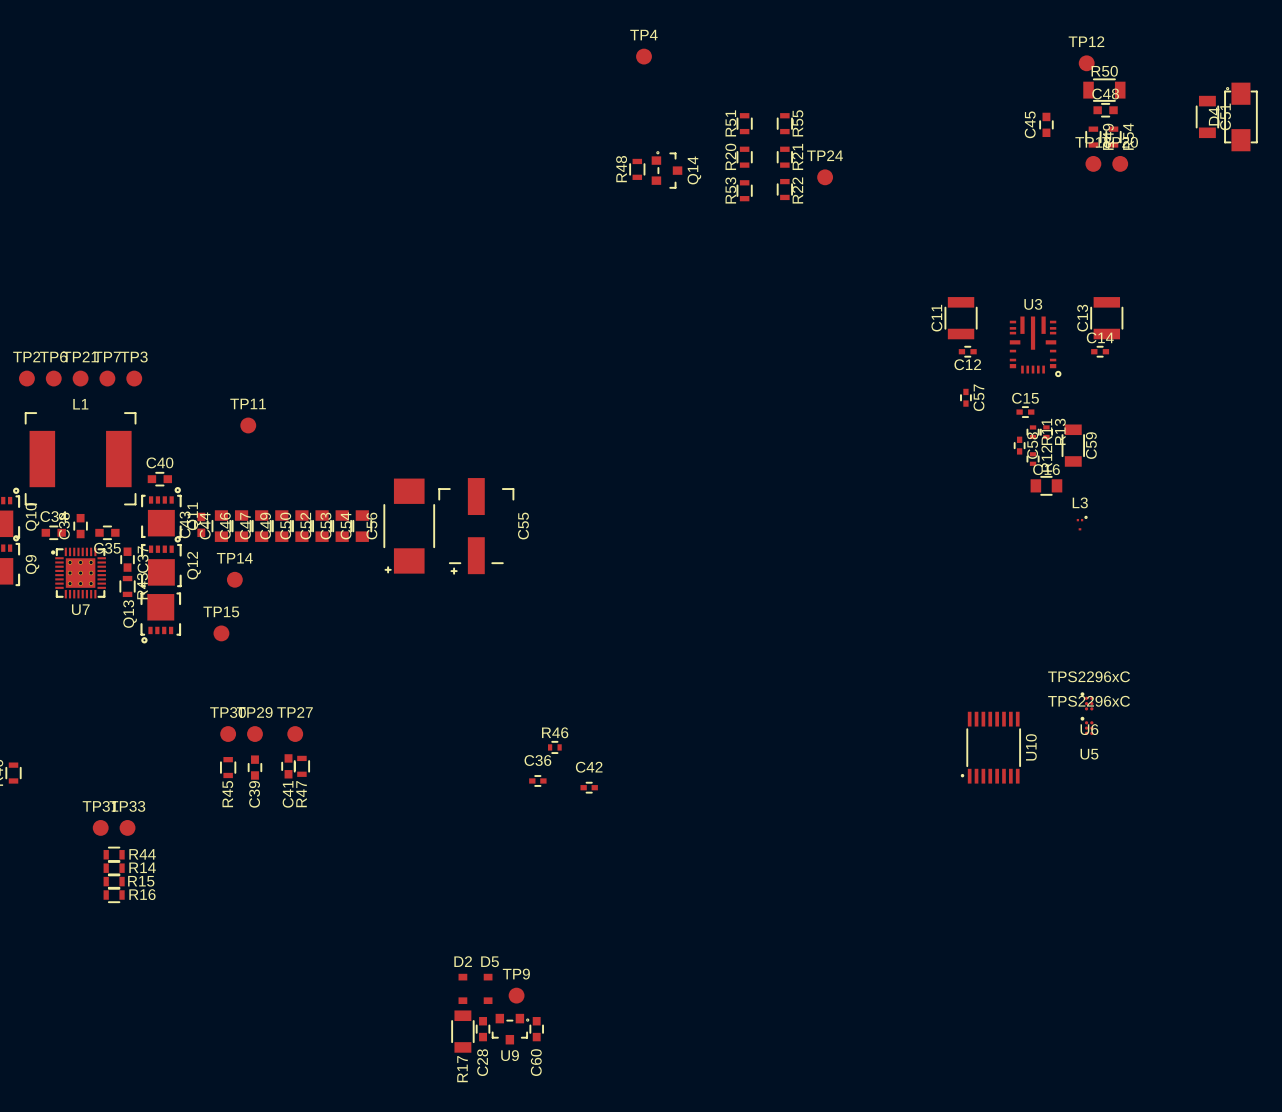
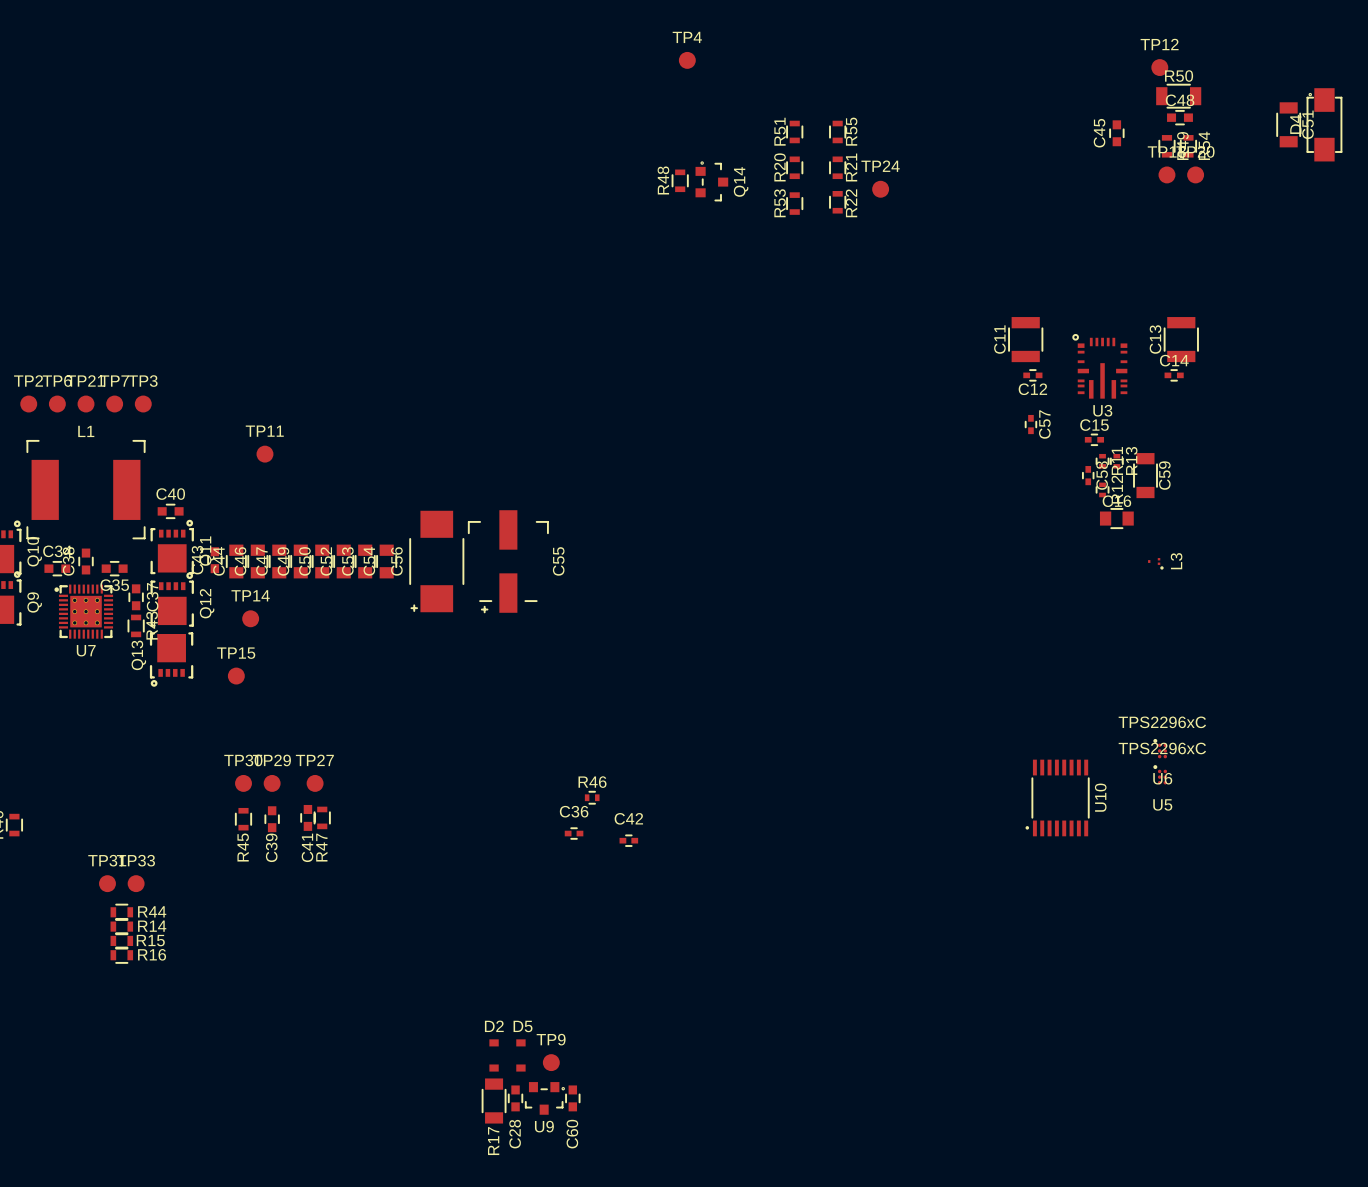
U3 rotation: 0° (1035, 346) -> 180° (1099, 366)
L3 rotation: 0° (1082, 523) -> 90° clockwise (1155, 563)

